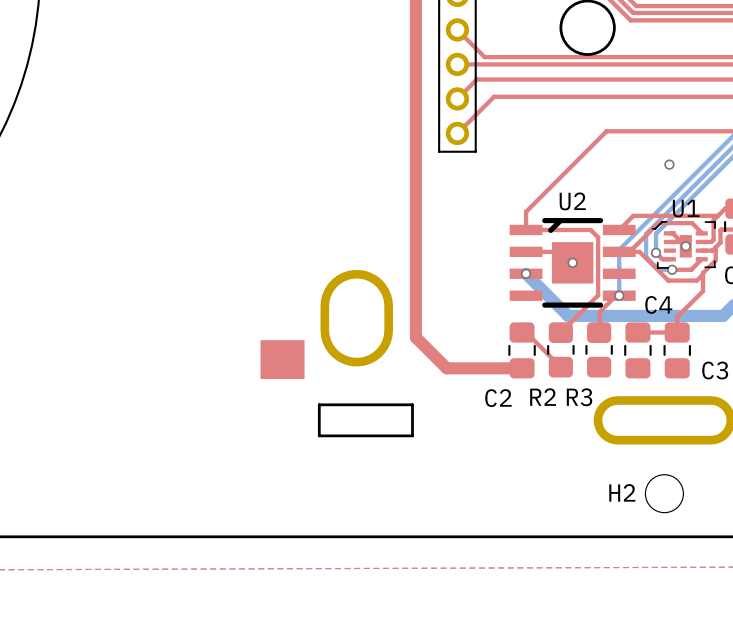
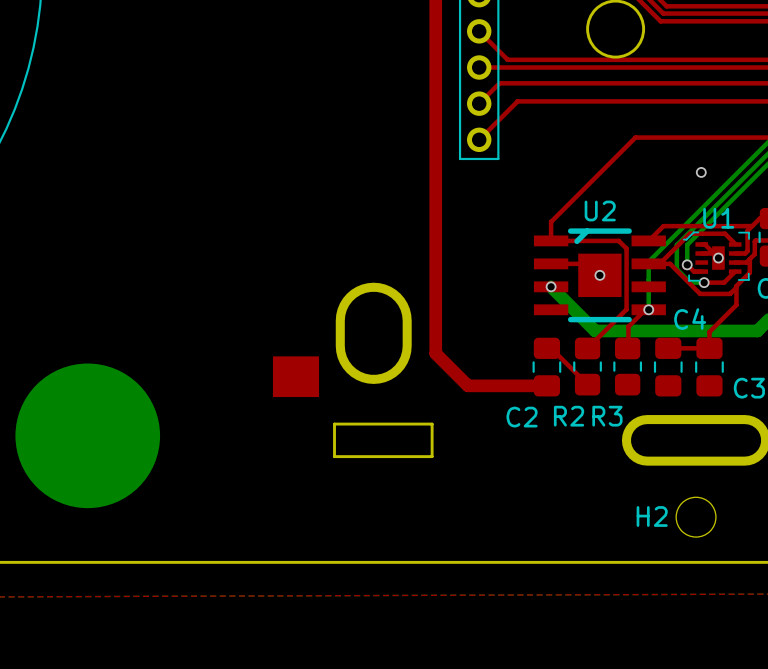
part: none -> (87, 435)

